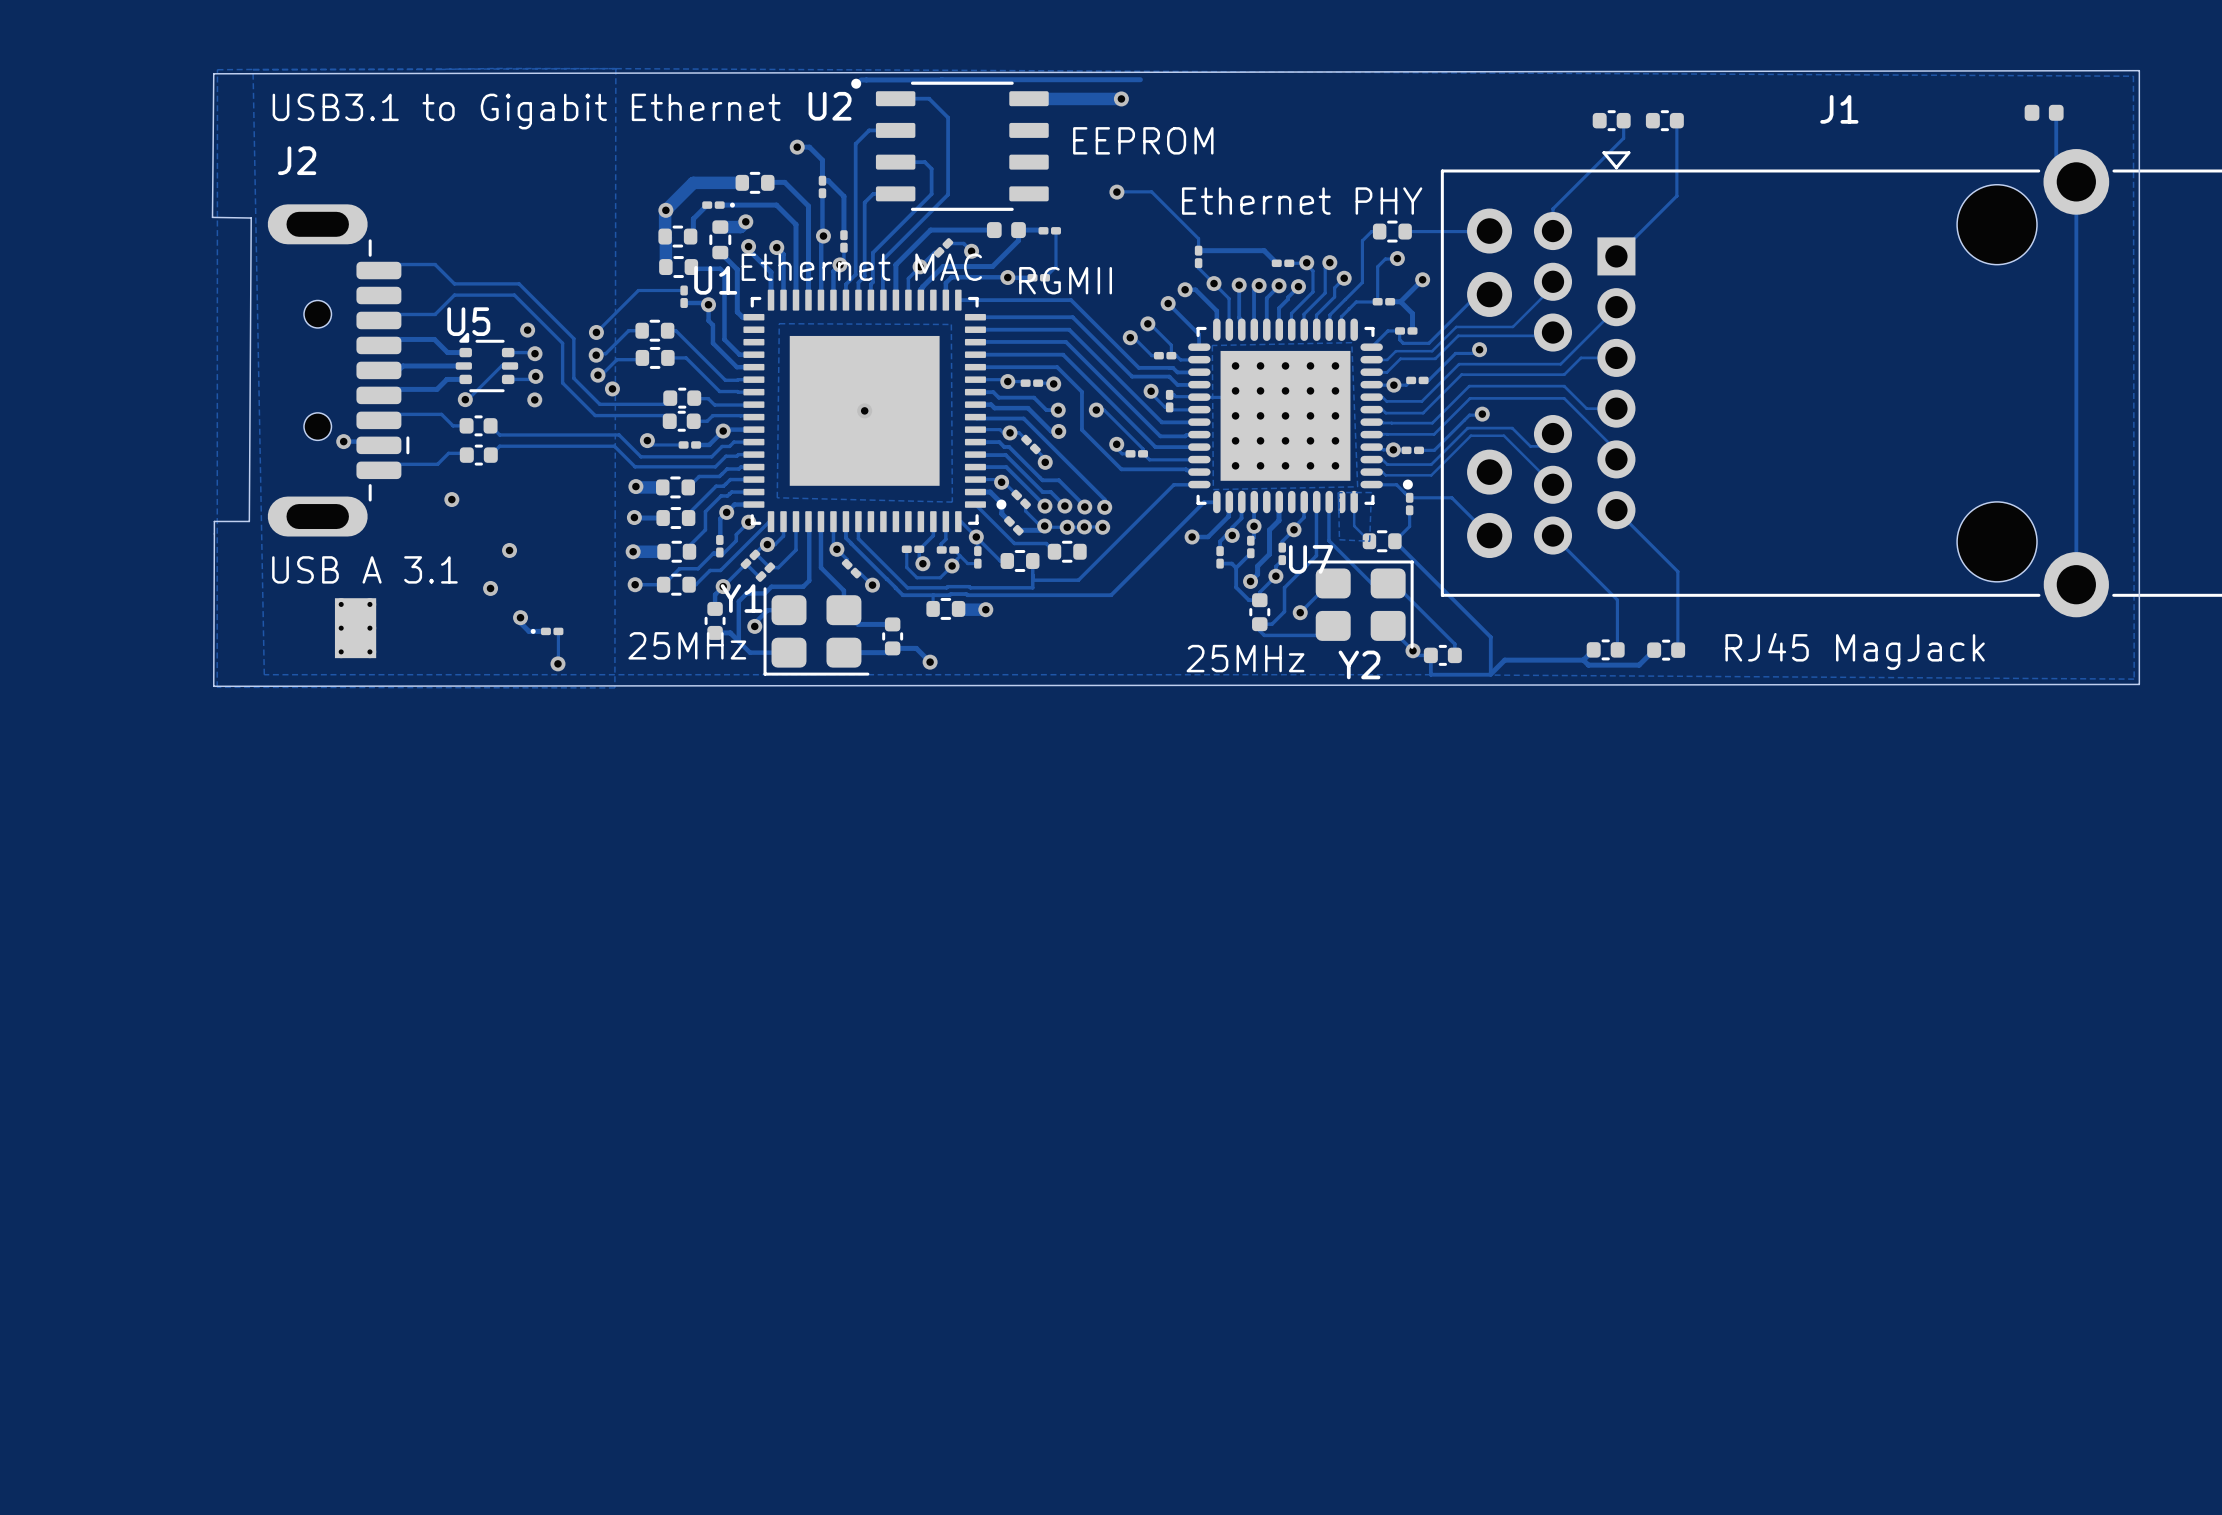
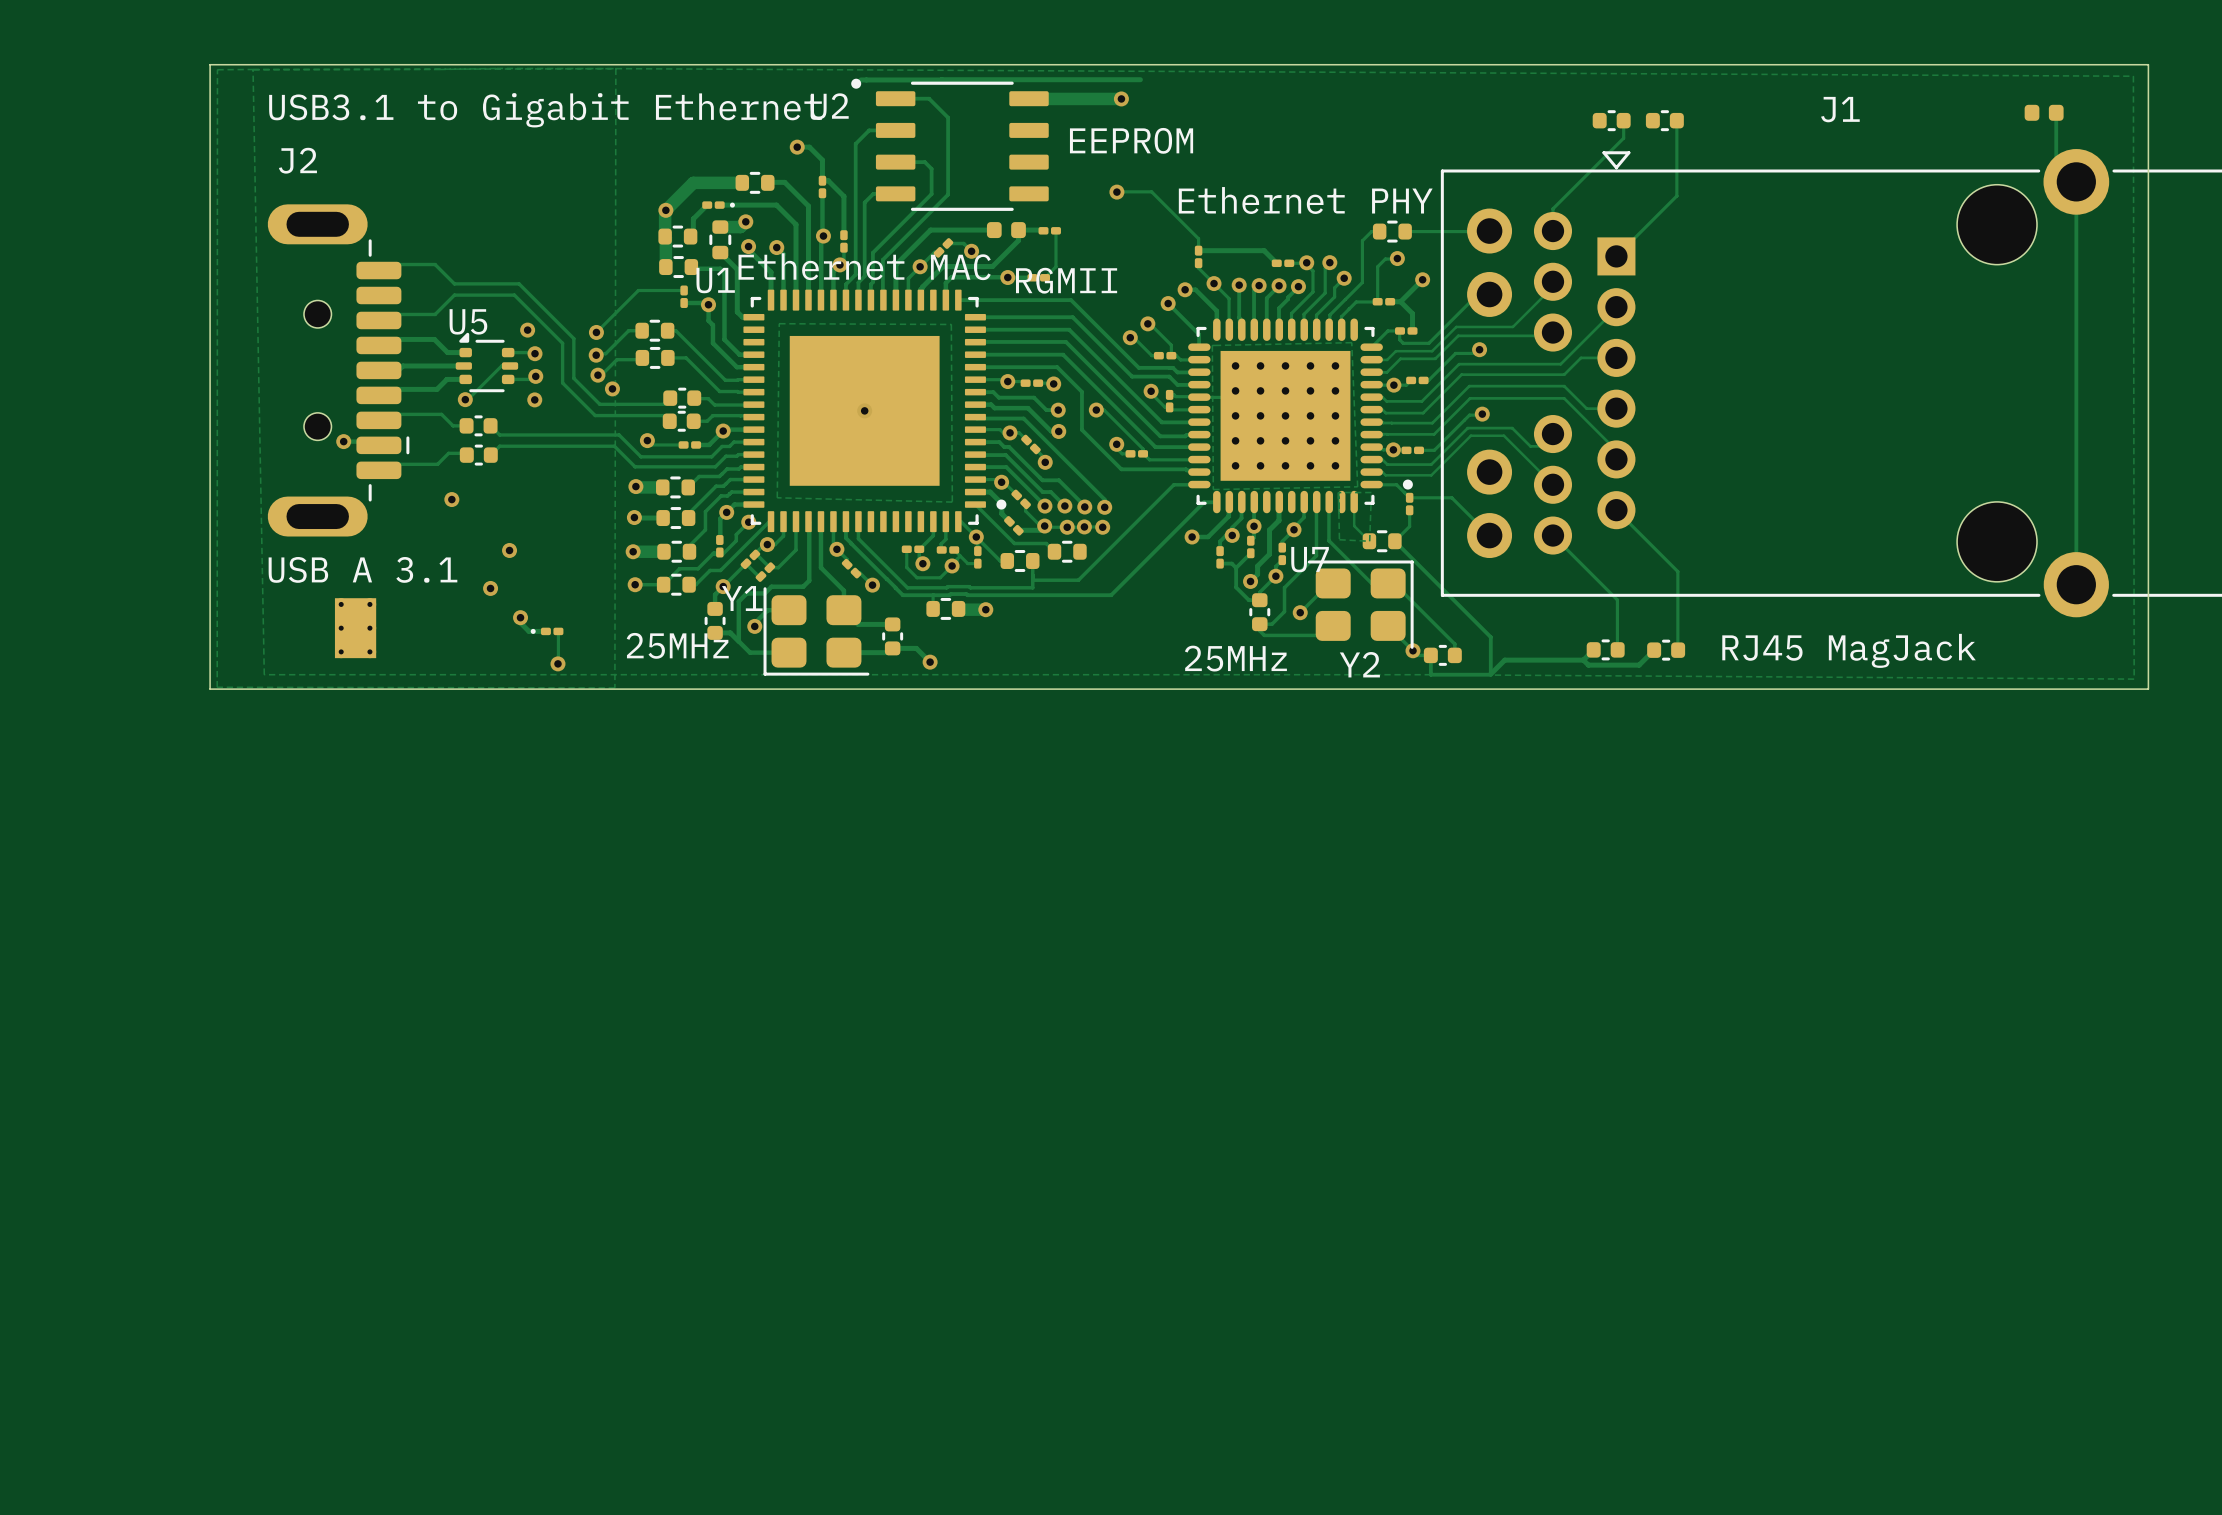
board edge: (2139, 70) (213, 73) (212, 217) (251, 218) (249, 521) (214, 521) (213, 686) (2139, 684) (2139, 70) -> (210, 64) (210, 689) (2148, 689) (2148, 64) (210, 64)

